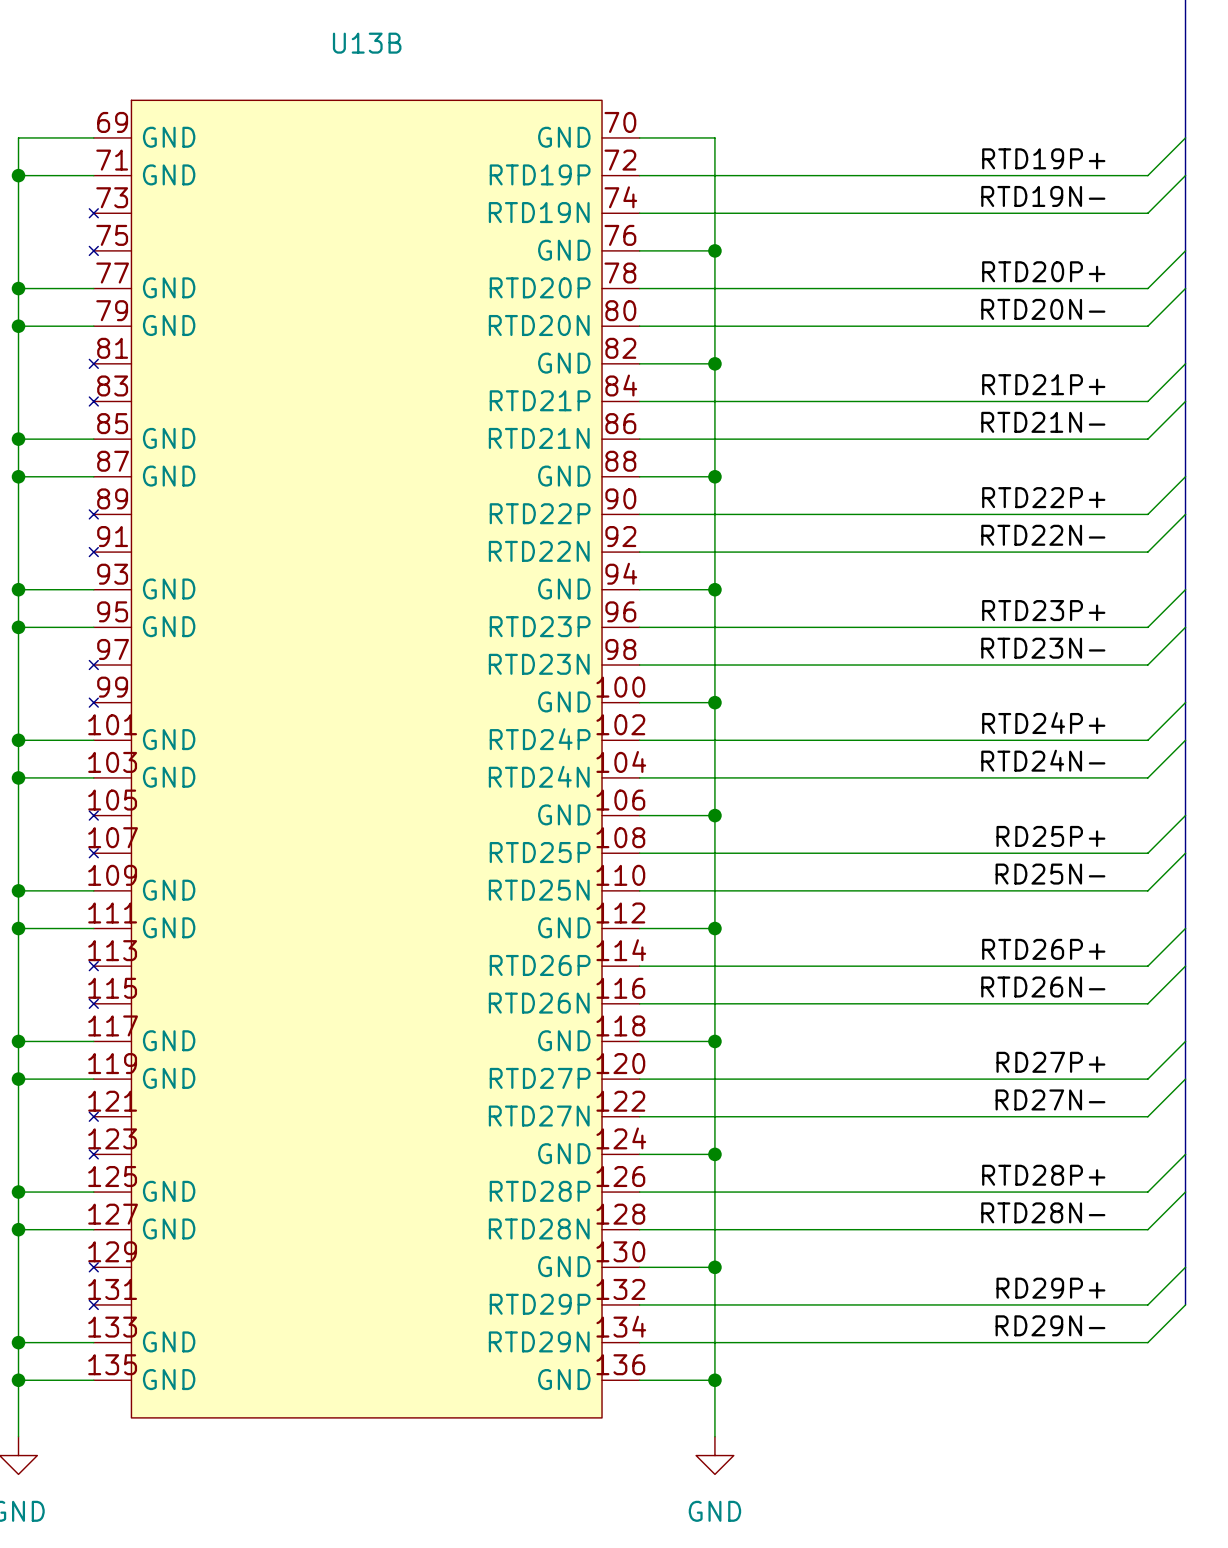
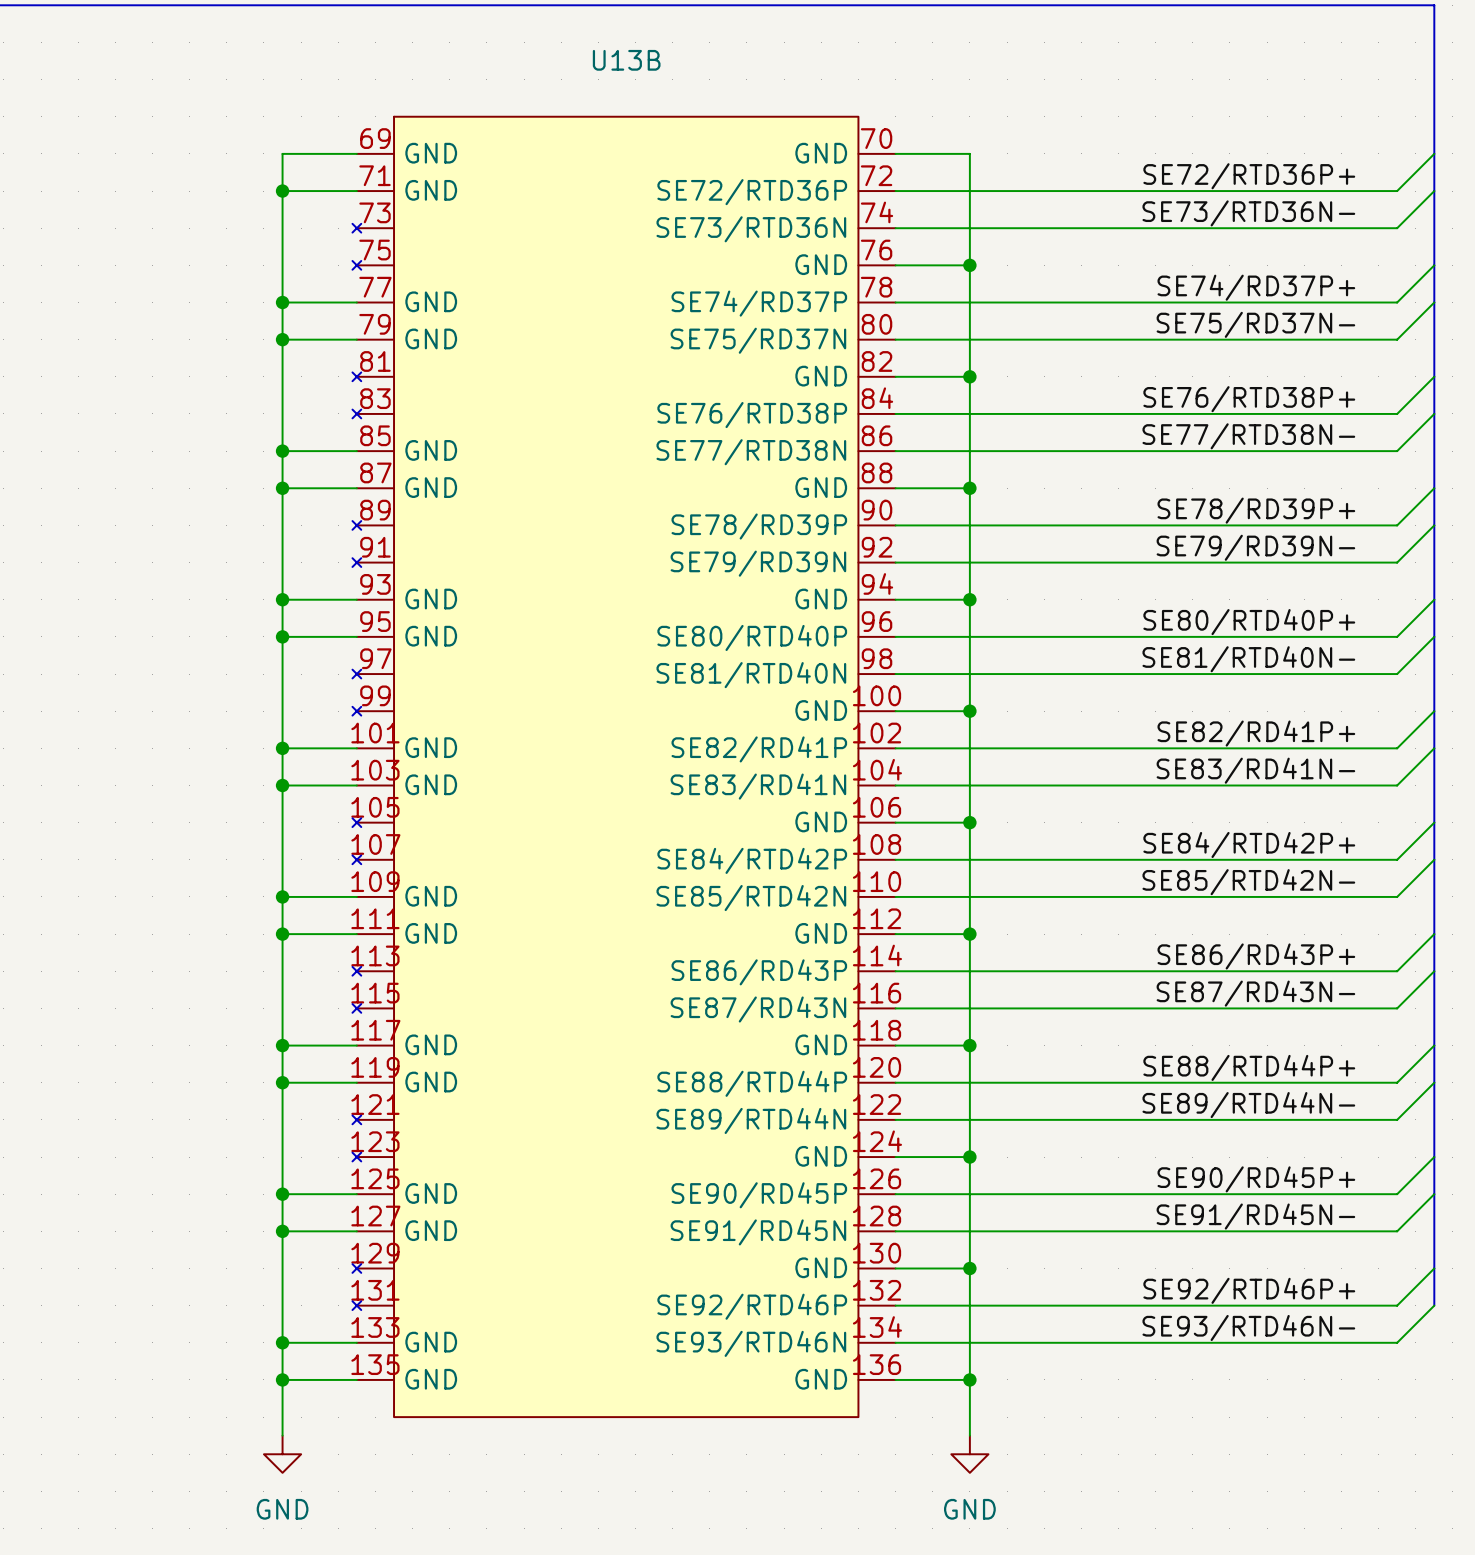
U13B symbol: [89, 100, 640, 1418] -> [352, 116, 896, 1418]
label: RTD19P+ (1043, 158) -> SE72/RTD36P+ (1249, 176)
label: RTD19N- (1043, 196) -> SE73/RTD36N- (1248, 213)
label: RTD20P+ (1043, 271) -> SE74/RD37P+ (1256, 287)
label: RTD20N- (1043, 309) -> SE75/RD37N- (1255, 324)
label: RTD21P+ (1043, 384) -> SE76/RTD38P+ (1249, 399)
label: RTD21N- (1043, 422) -> SE77/RTD38N- (1248, 436)
label: RTD22P+ (1043, 497) -> SE78/RD39P+ (1256, 510)
label: RTD22N- (1043, 535) -> SE79/RD39N- (1255, 547)
label: RTD23P+ (1043, 610) -> SE80/RTD40P+ (1249, 622)
label: RTD23N- (1043, 648) -> SE81/RTD40N- (1248, 659)
label: RTD24P+ (1043, 723) -> SE82/RD41P+ (1256, 733)
label: RTD24N- (1043, 760) -> SE83/RD41N- (1255, 770)
label: RD25P+ (1050, 836) -> SE84/RTD42P+ (1249, 845)
label: RD25N- (1050, 874) -> SE85/RTD42N- (1248, 882)
label: RTD26P+ (1043, 949) -> SE86/RD43P+ (1256, 956)
label: RTD26N- (1043, 987) -> SE87/RD43N- (1255, 993)
label: RD27P+ (1050, 1062) -> SE88/RTD44P+ (1249, 1067)
label: RD27N- (1050, 1099) -> SE89/RTD44N- (1248, 1105)
label: RTD28P+ (1043, 1175) -> SE90/RD45P+ (1256, 1179)
label: RTD28N- (1043, 1212) -> SE91/RD45N- (1255, 1216)
label: RD29P+ (1050, 1288) -> SE92/RTD46P+ (1249, 1290)
label: RD29N- (1050, 1325) -> SE93/RTD46N- (1248, 1327)

